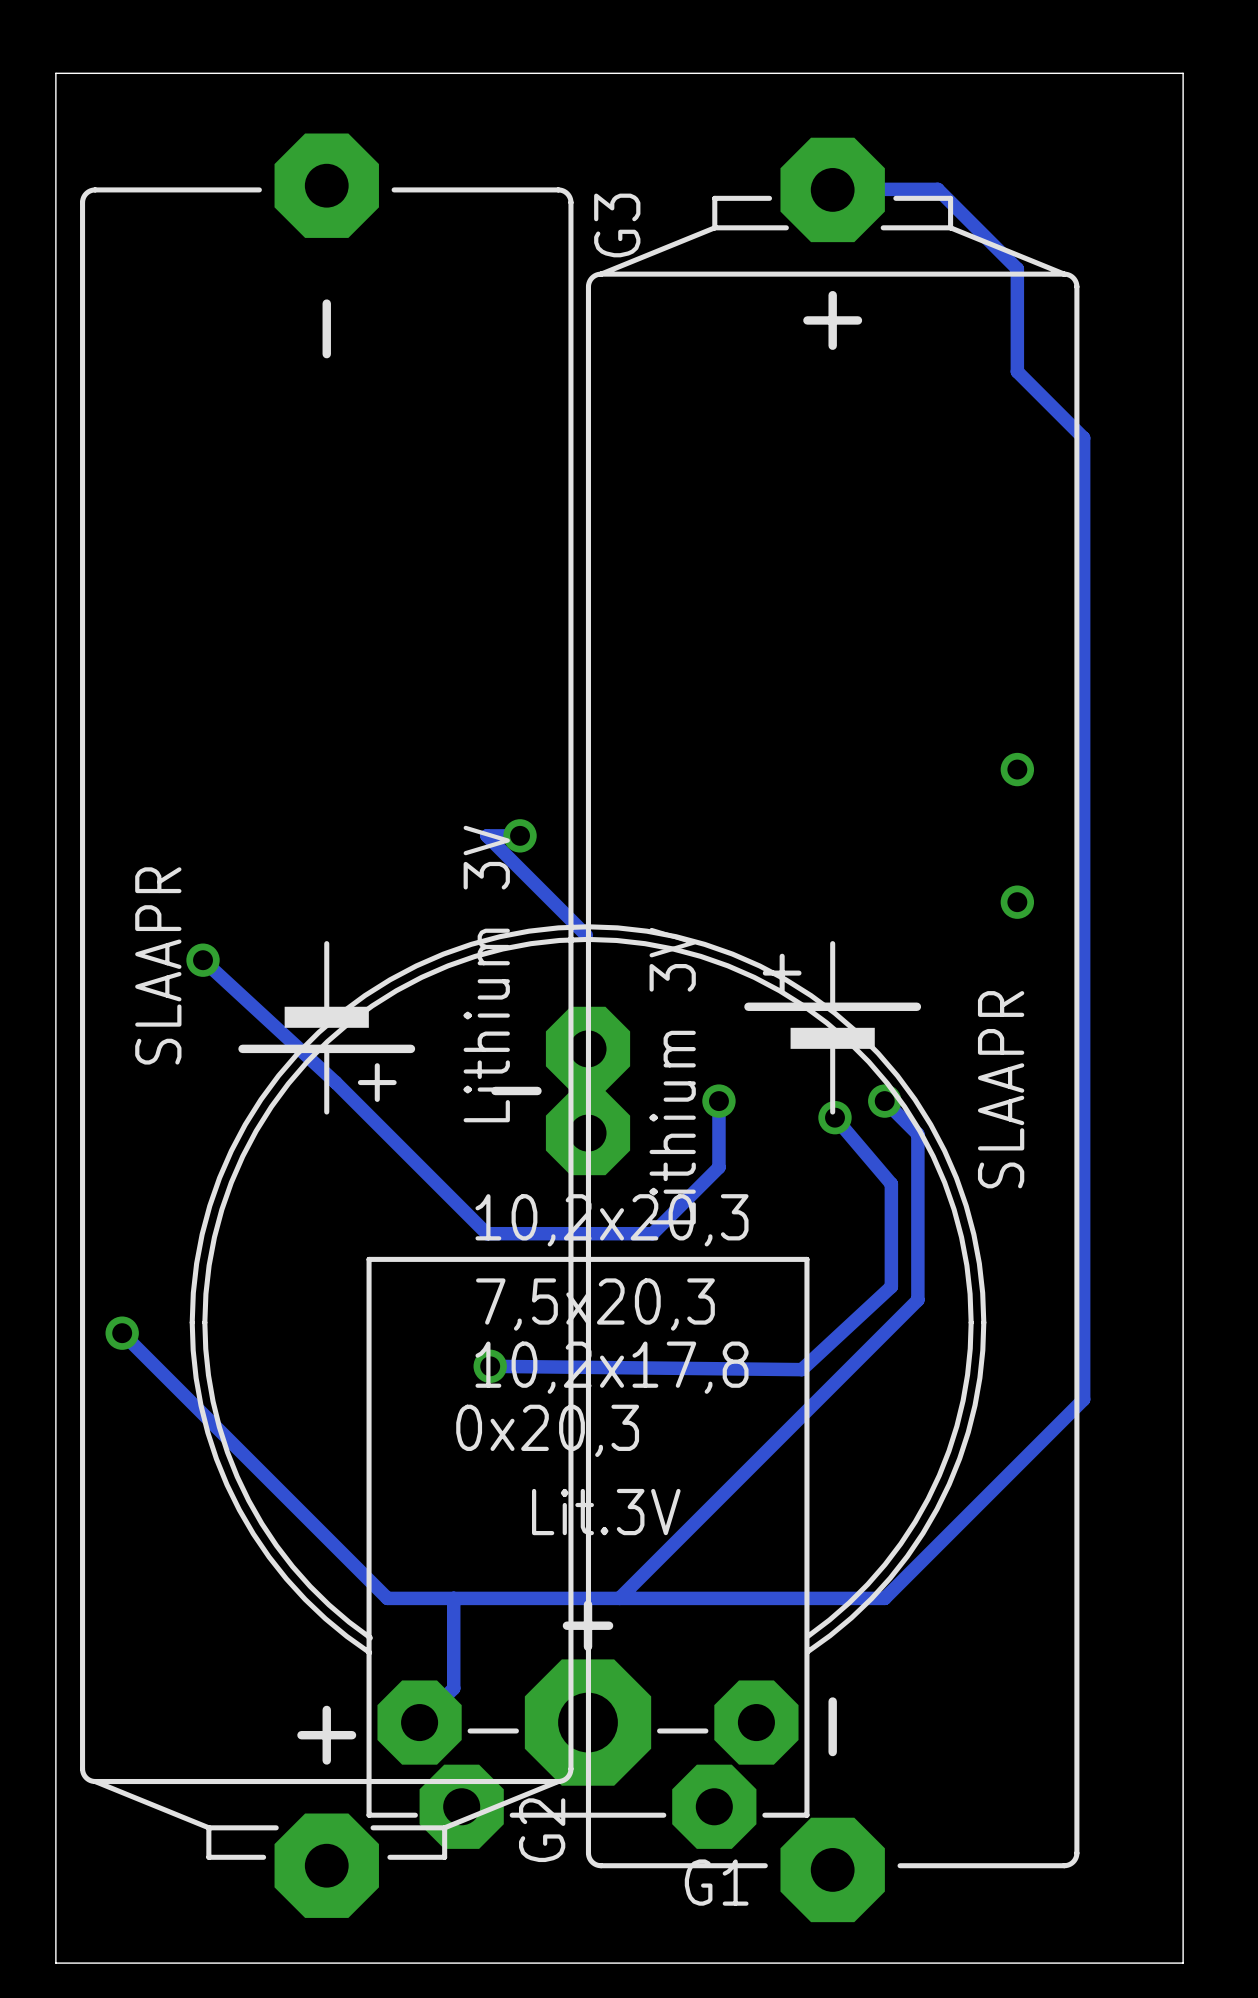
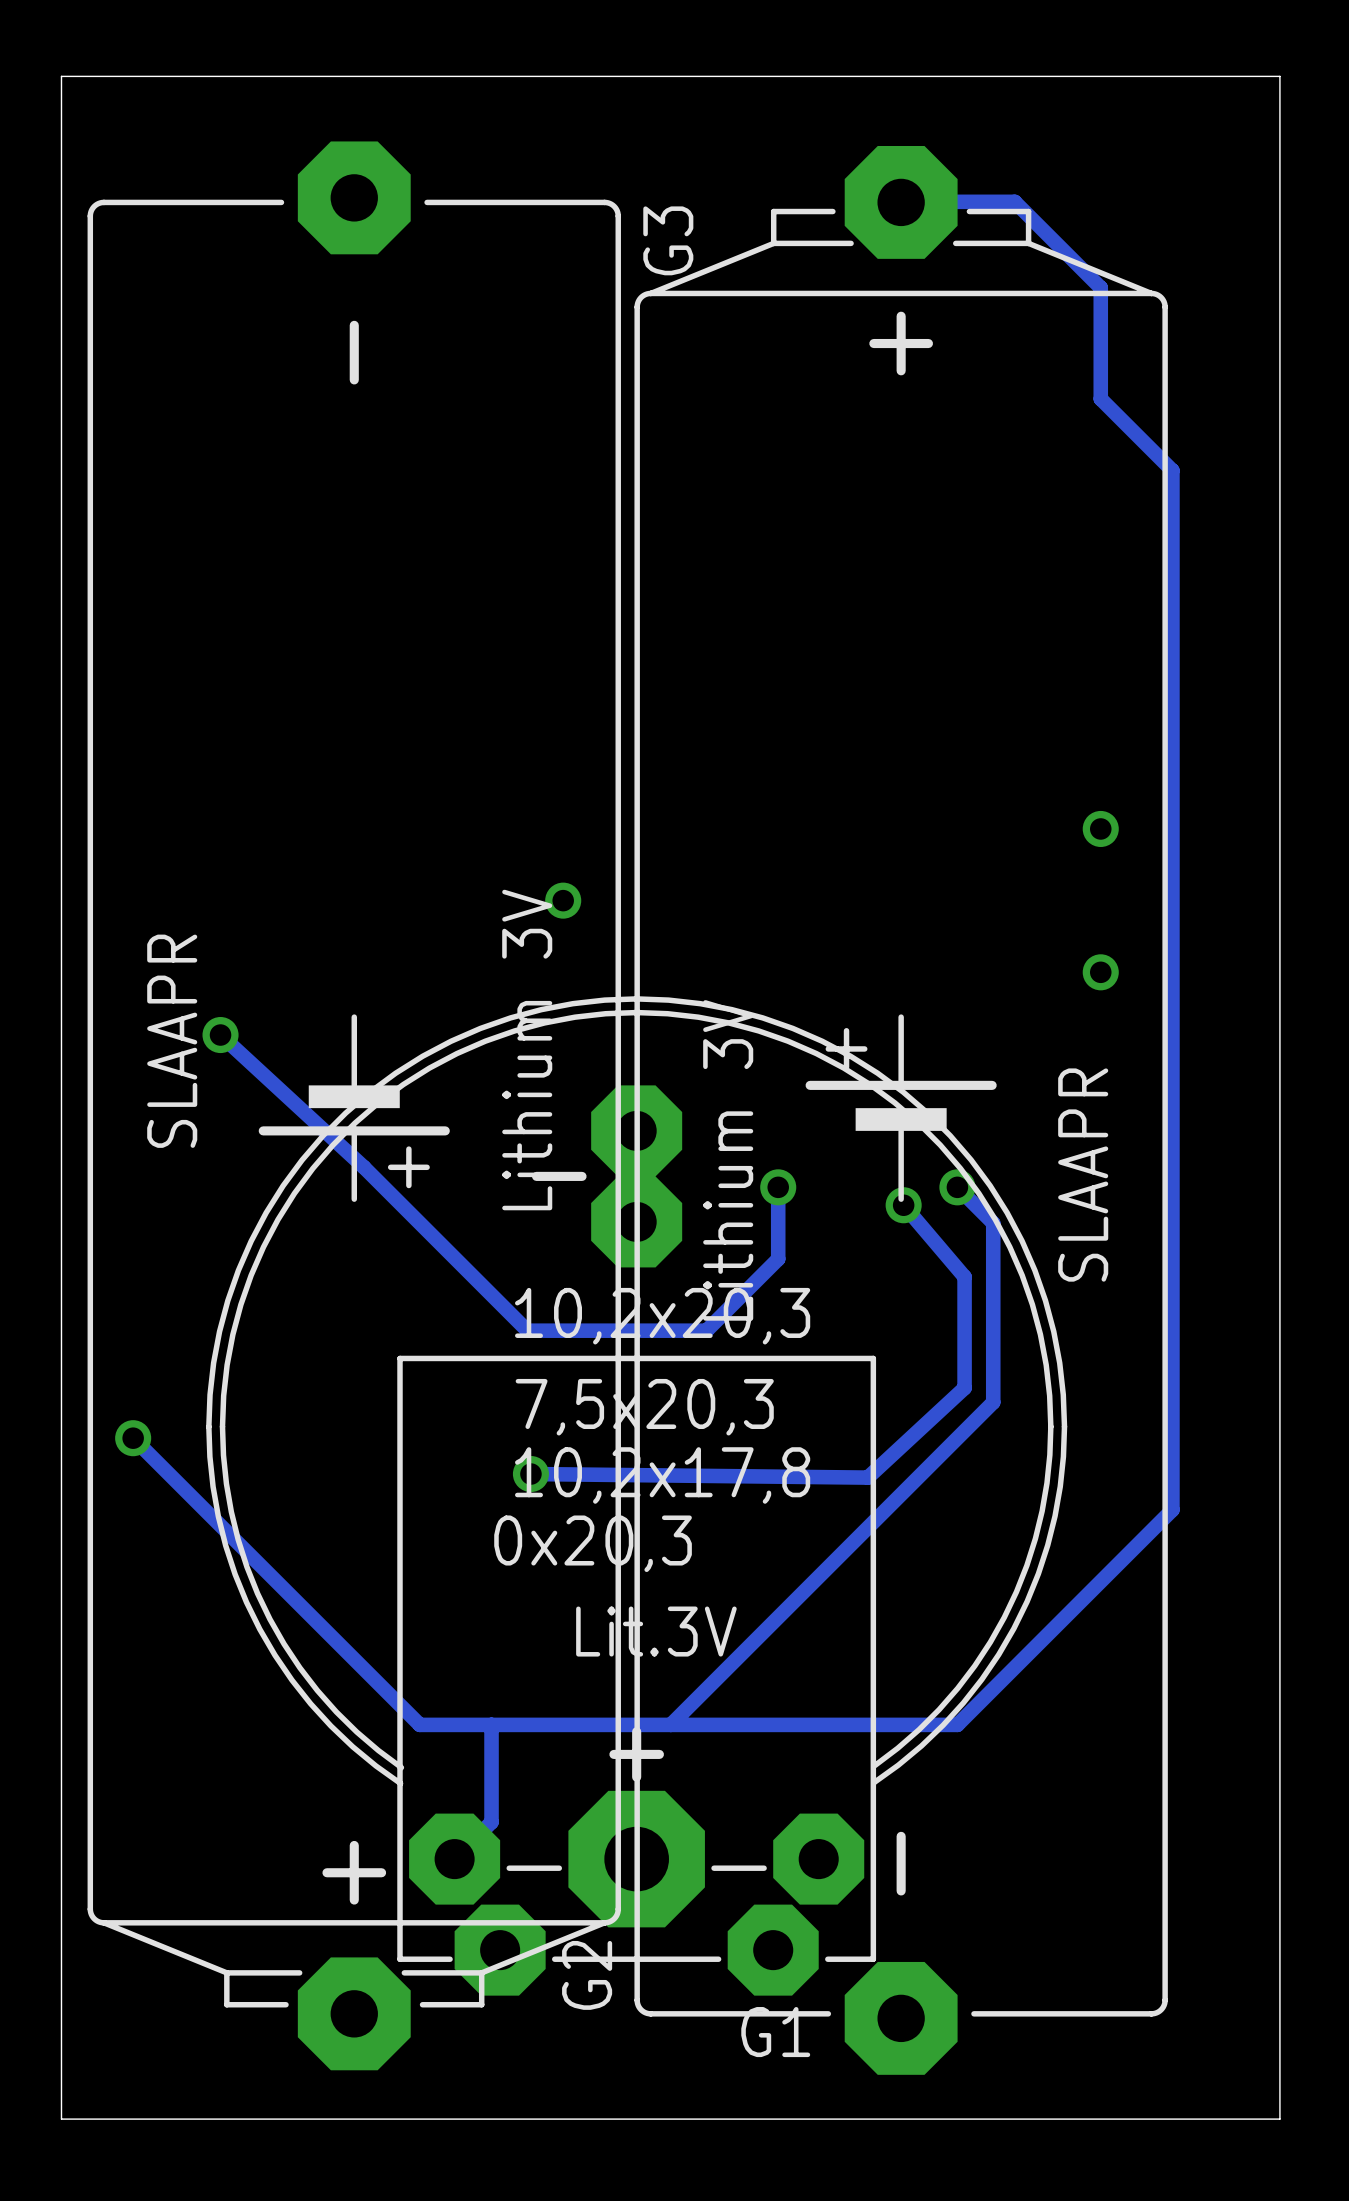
track: (520, 835) (486, 835) (586, 935) -> none

